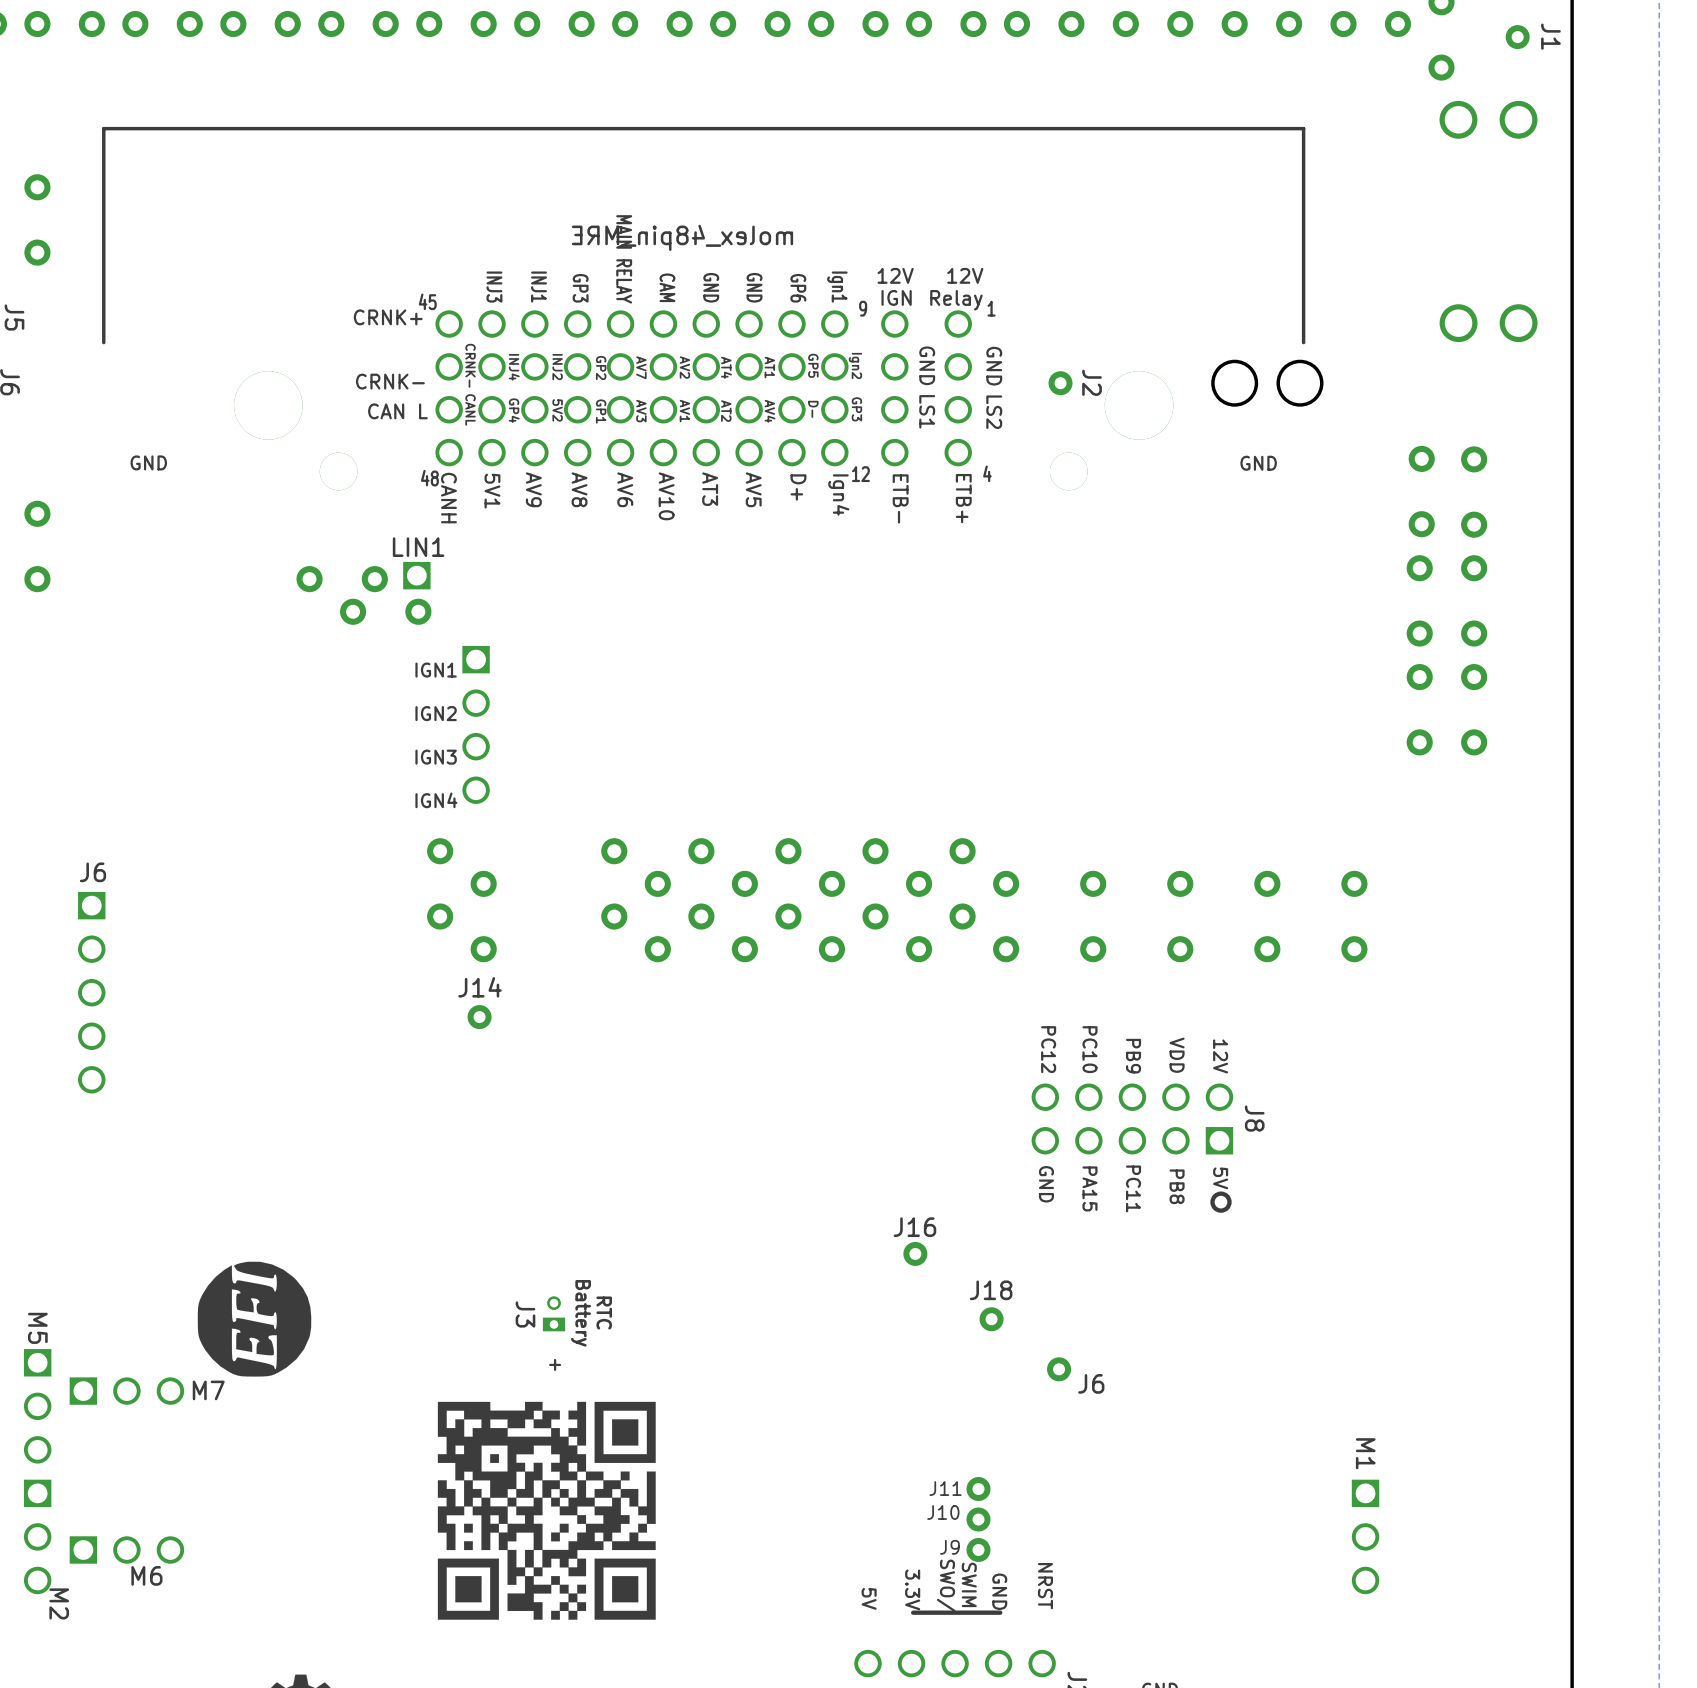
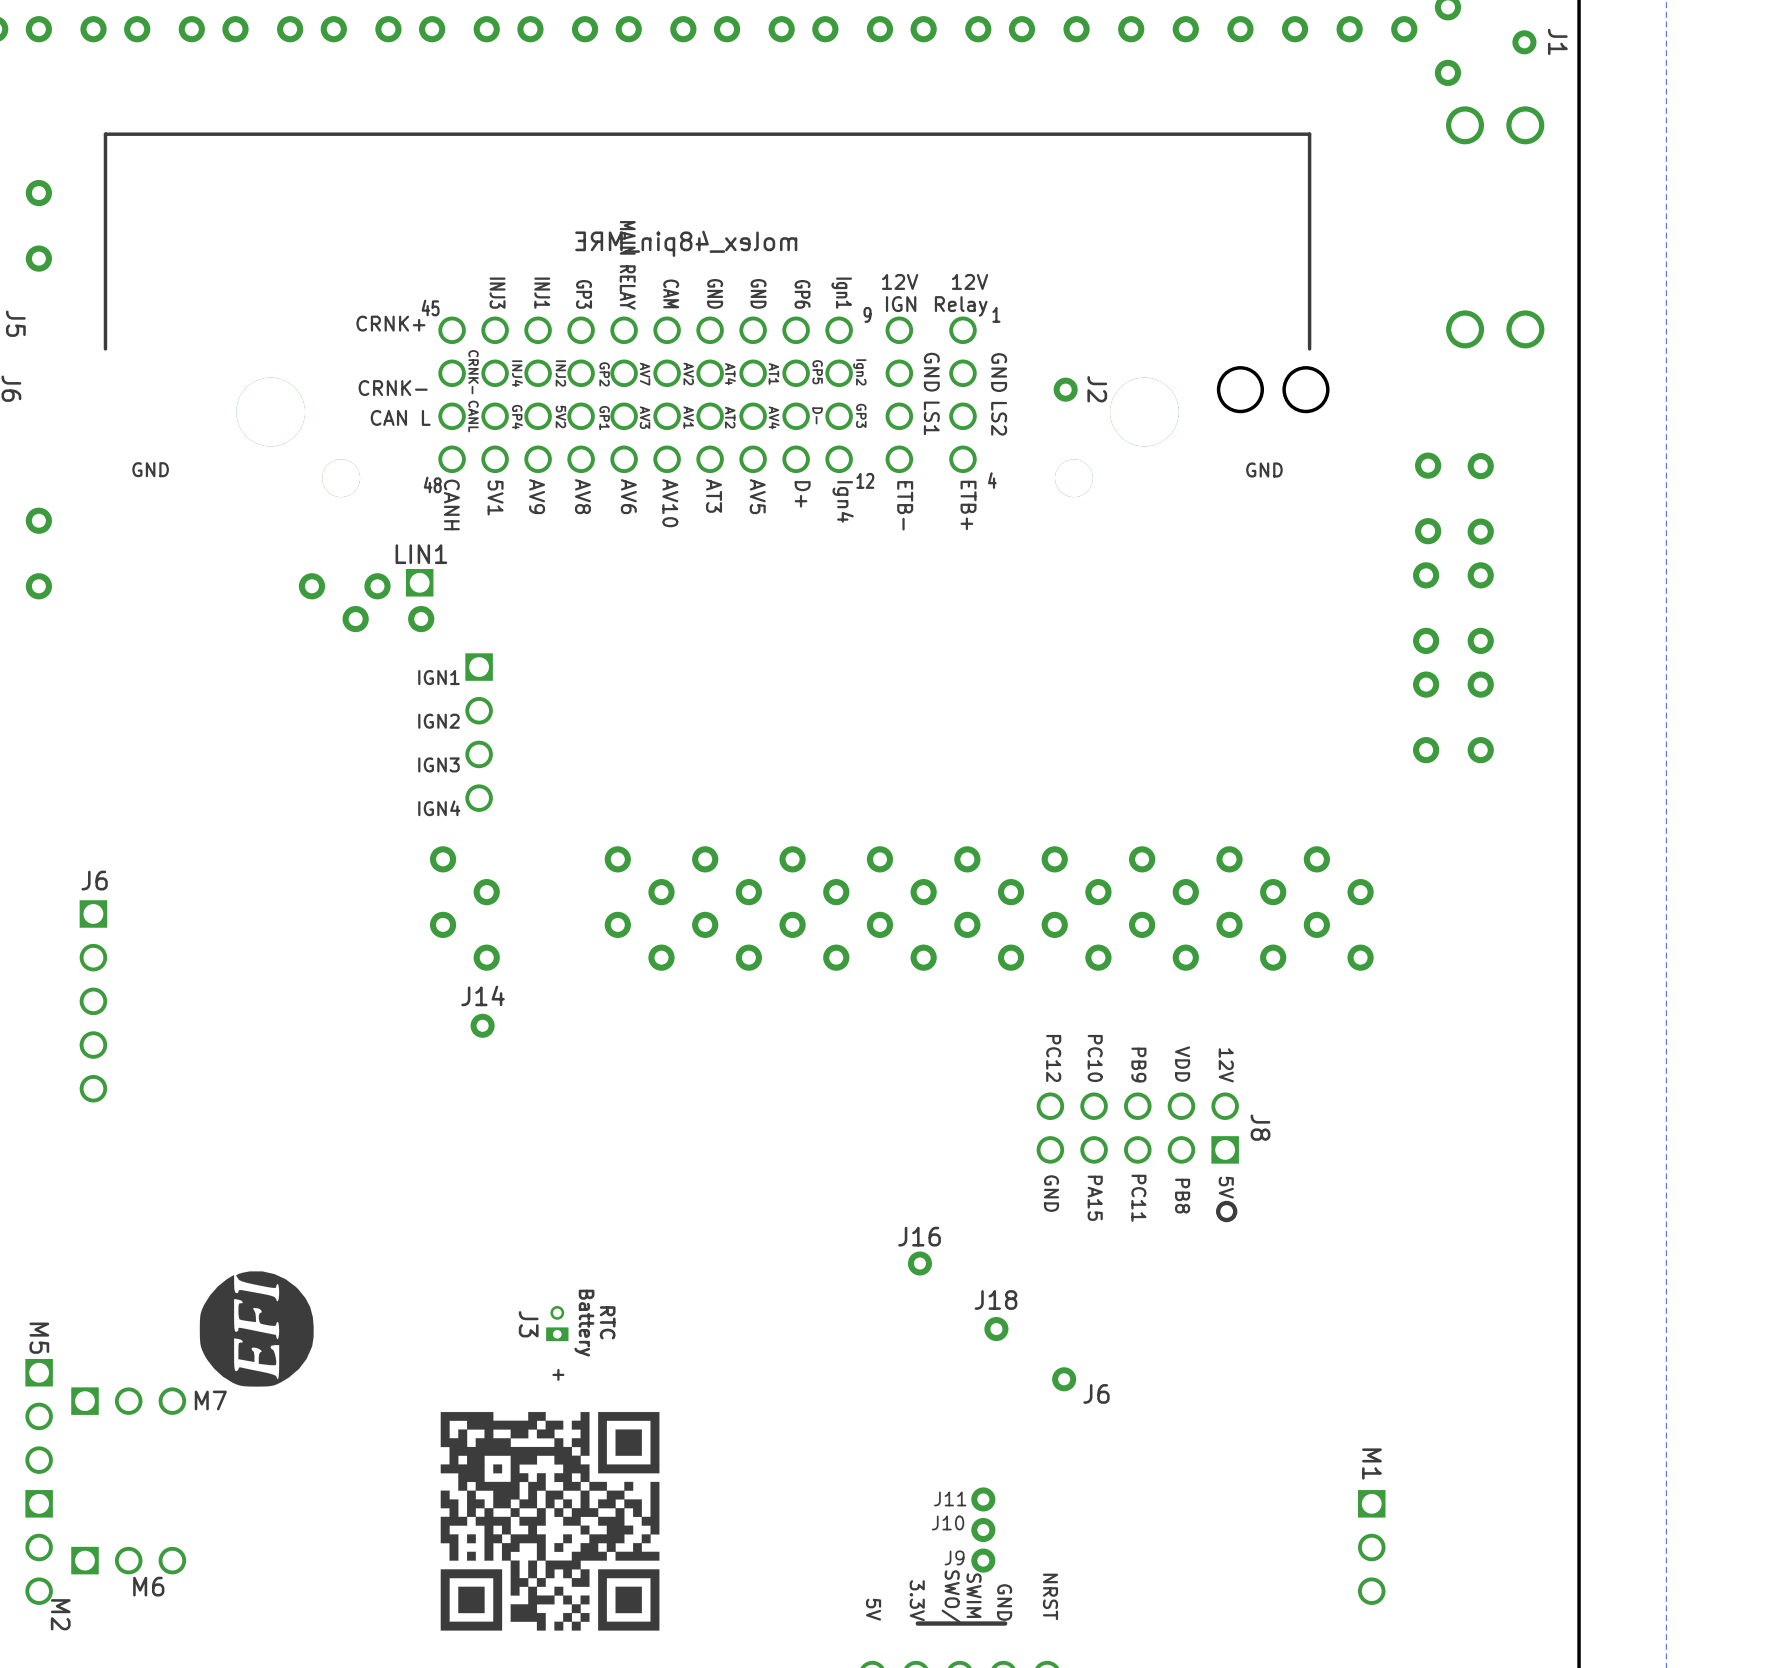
part: none -> (1054, 892)
part: none -> (1142, 892)
part: none -> (1229, 892)
part: none -> (1316, 892)

